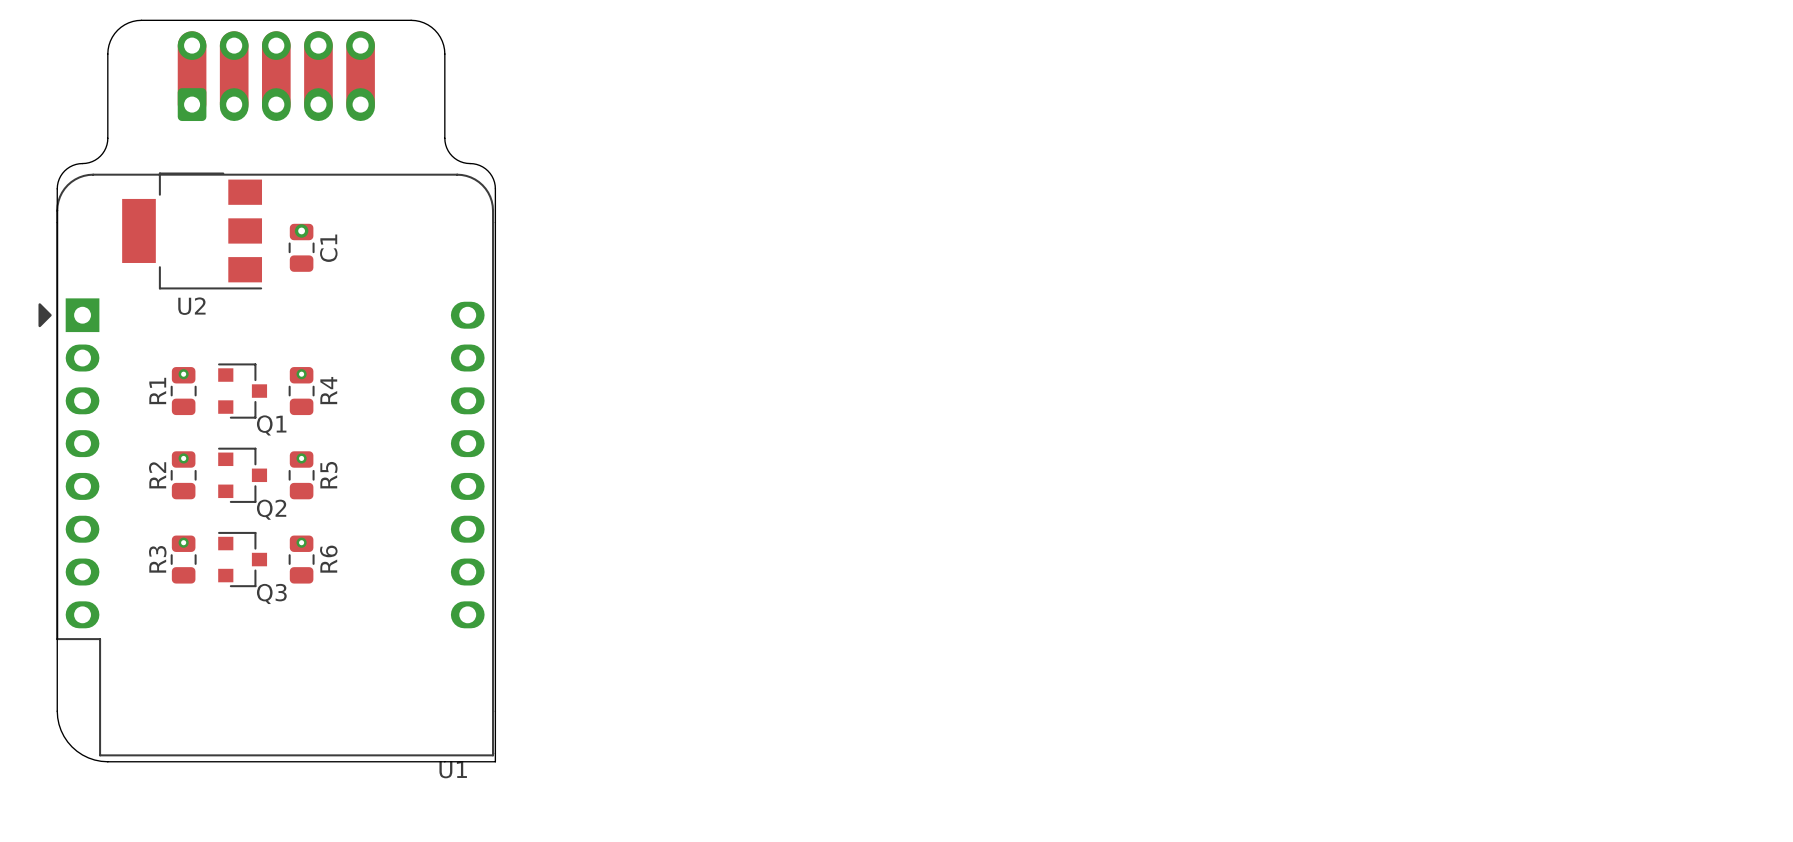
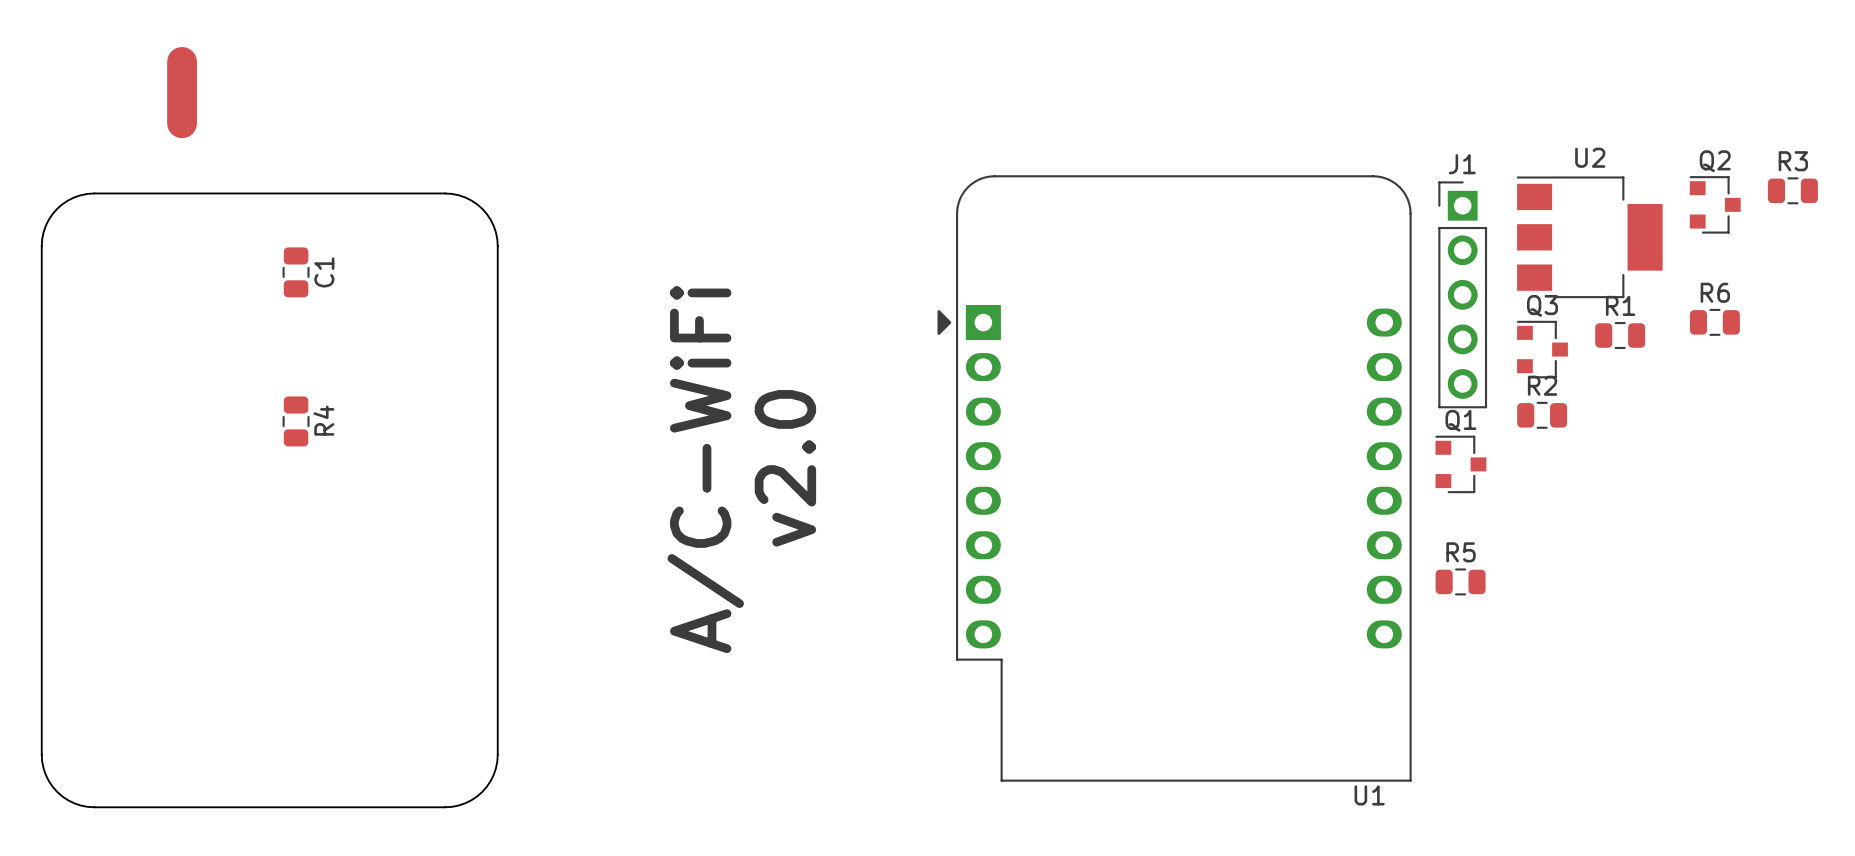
via: (192, 45) -> none
track: (234, 45) (234, 104) -> none
via: (234, 45) -> none
track: (276, 45) (276, 104) -> none
via: (276, 45) -> none
track: (318, 45) (318, 104) -> none
via: (318, 45) -> none
track: (360, 45) (360, 104) -> none
via: (360, 45) -> none
part: (276, 104) -> none
board edge: (57, 222) (57, 185) (60, 176) (72, 165) (89, 162) (97, 158) (106, 144) (107, 54) (110, 41) (114, 33) (124, 24) (141, 20) (411, 20) (427, 24) (437, 33) (444, 49) (444, 138) (446, 147) (457, 160) (479, 165) (491, 176) (495, 185) (495, 222) -> (41, 246) (45, 225) (57, 208) (74, 197) (94, 193) (451, 193) (471, 200) (486, 214) (493, 225) (497, 246)
U2 rotation: 0° (192, 230) -> 180° (1589, 237)
U2 position: (192, 230) -> (1589, 237)
via: (301, 230) -> none
J1: none -> (1462, 294)
via: (183, 374) -> none
via: (301, 374) -> none
R1 rotation: 0° (183, 391) -> 90° clockwise (1620, 335)
R1 position: (183, 391) -> (1620, 335)
Q1 position: (242, 391) -> (1460, 464)
Q1 name position: Q1 (271, 425) -> Q1 (1460, 420)
text: none -> v2.0 (785, 468)
text: none -> A/C-WiFi (705, 469)
via: (183, 458) -> none
via: (301, 458) -> none
U1 position: (266, 465) -> (1174, 478)
R2 rotation: 0° (183, 475) -> 90° clockwise (1542, 415)
R2 position: (183, 475) -> (1542, 415)
Q2 position: (242, 475) -> (1715, 204)
R5 rotation: 0° (301, 475) -> 90° clockwise (1460, 581)
R5 position: (301, 475) -> (1460, 581)
R5 name position: R5 (328, 475) -> R5 (1461, 552)
Q2 name position: Q2 (271, 509) -> Q2 (1715, 161)
via: (183, 542) -> none
via: (301, 542) -> none
R3 rotation: 0° (183, 559) -> 90° clockwise (1792, 190)
R3 position: (183, 559) -> (1792, 190)
Q3 position: (242, 559) -> (1542, 349)
R6 rotation: 0° (301, 559) -> 90° clockwise (1714, 322)
R6 position: (301, 559) -> (1714, 322)
R6 name position: R6 (328, 559) -> R6 (1715, 292)
Q3 name position: Q3 (271, 593) -> Q3 (1542, 305)
board edge: (495, 711) (495, 761) (444, 761) -> (497, 754) (493, 774) (482, 791) (465, 803) (445, 807)

